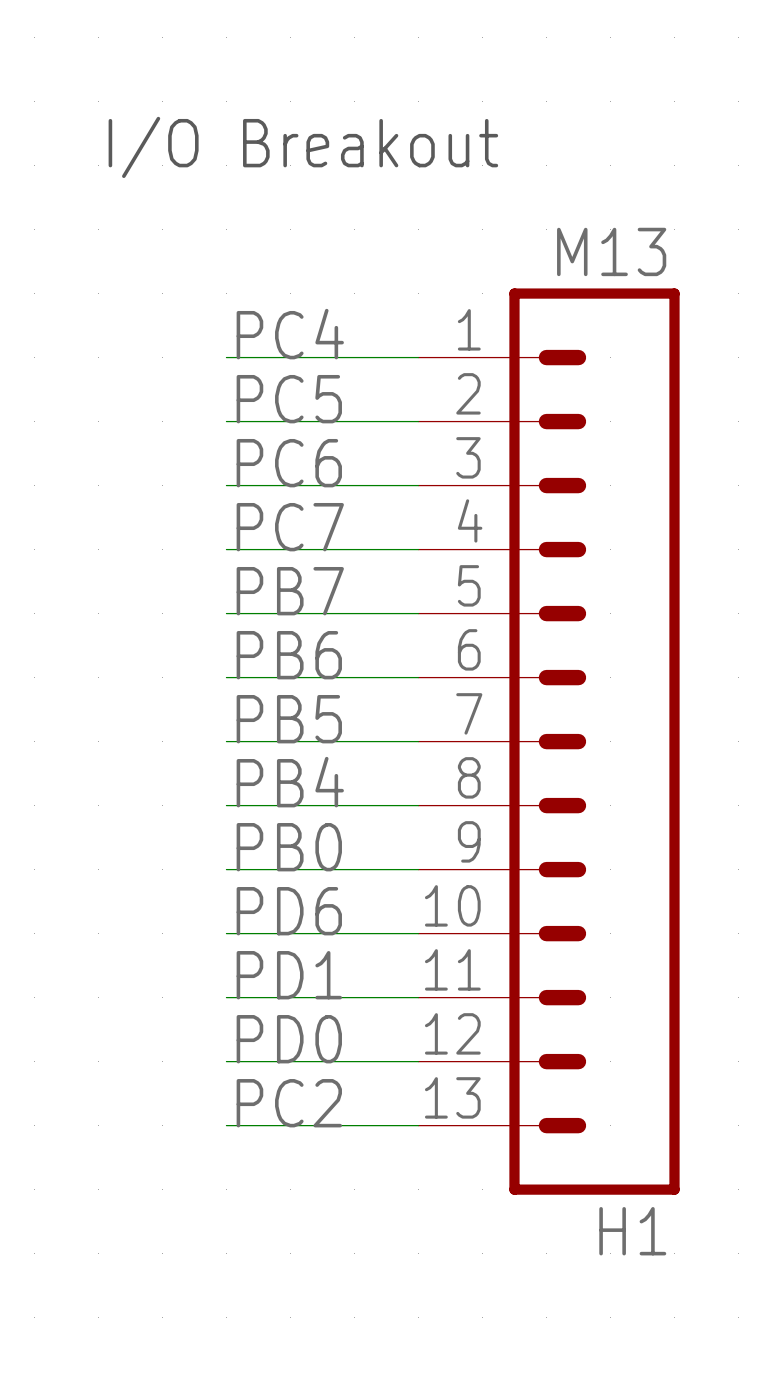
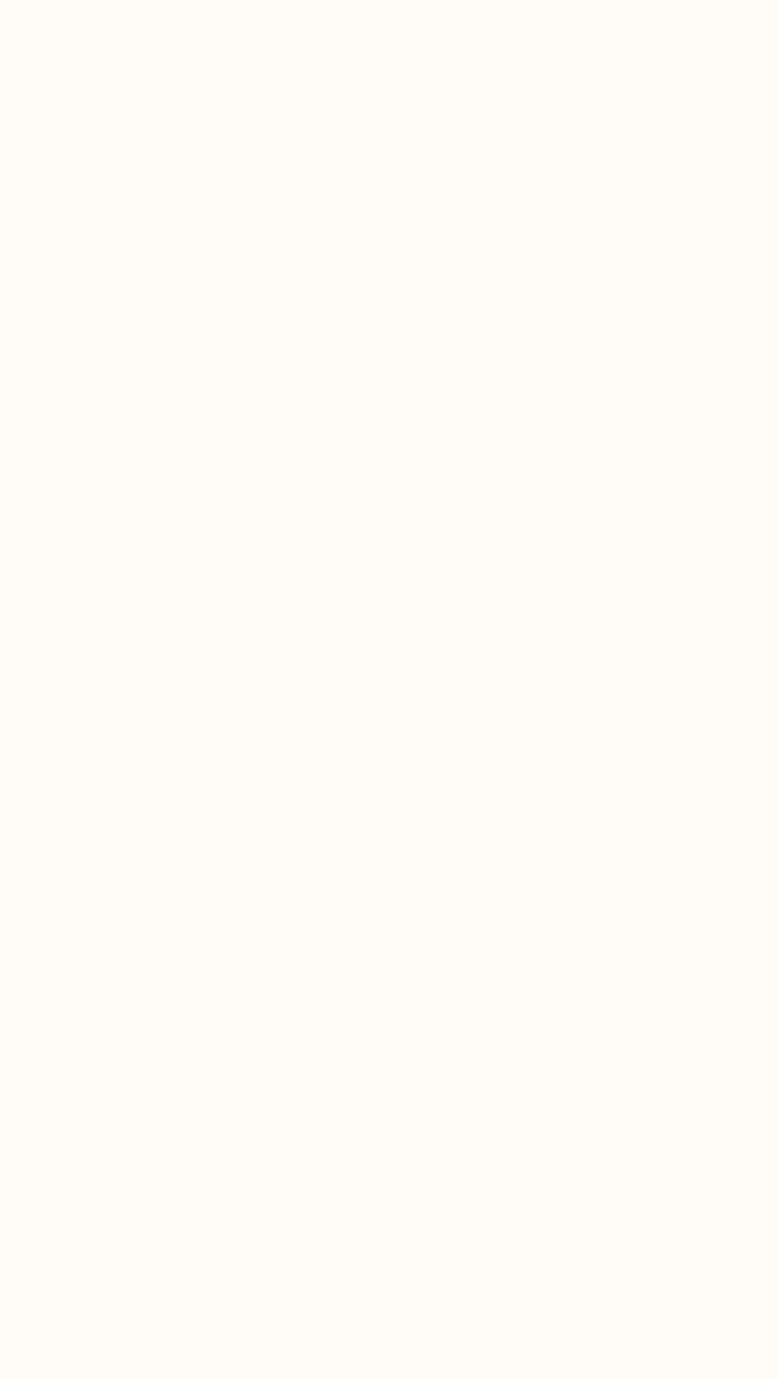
text: I/O Breakout (303, 147) -> none
label: PC4 (290, 334) -> none
wire: (226, 357) (418, 357) -> none
label: PC5 (289, 399) -> none
wire: (226, 421) (418, 421) -> none
label: PC6 (289, 463) -> none
wire: (226, 485) (418, 485) -> none
label: PC7 (290, 527) -> none
wire: (226, 549) (418, 549) -> none
label: PB7 (290, 591) -> none
wire: (226, 613) (418, 613) -> none
label: PB6 (289, 655) -> none
wire: (226, 677) (418, 677) -> none
label: PB5 (289, 719) -> none
wire: (226, 741) (418, 741) -> none
H1: M13 (549, 741) -> none
label: PB4 (290, 782) -> none
wire: (226, 805) (418, 805) -> none
label: PB0 (289, 847) -> none
wire: (226, 869) (418, 869) -> none
label: PD6 (289, 911) -> none
wire: (226, 933) (418, 933) -> none
label: PD1 (289, 975) -> none
wire: (226, 997) (418, 997) -> none
label: PD0 (289, 1039) -> none
wire: (226, 1061) (418, 1061) -> none
label: PC2 (289, 1103) -> none
wire: (226, 1125) (418, 1125) -> none

